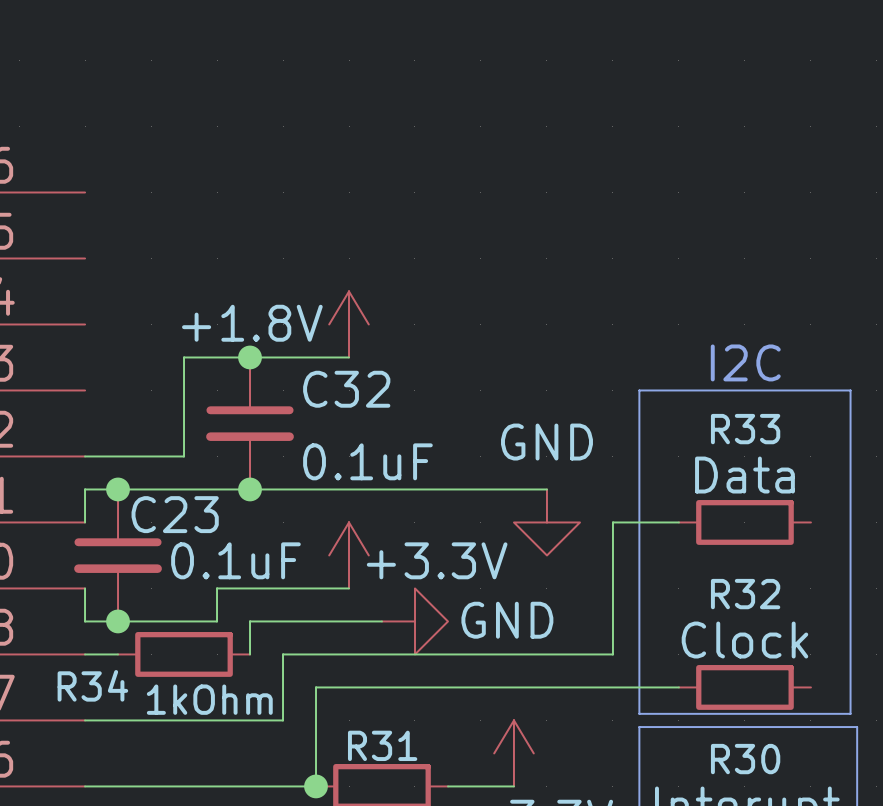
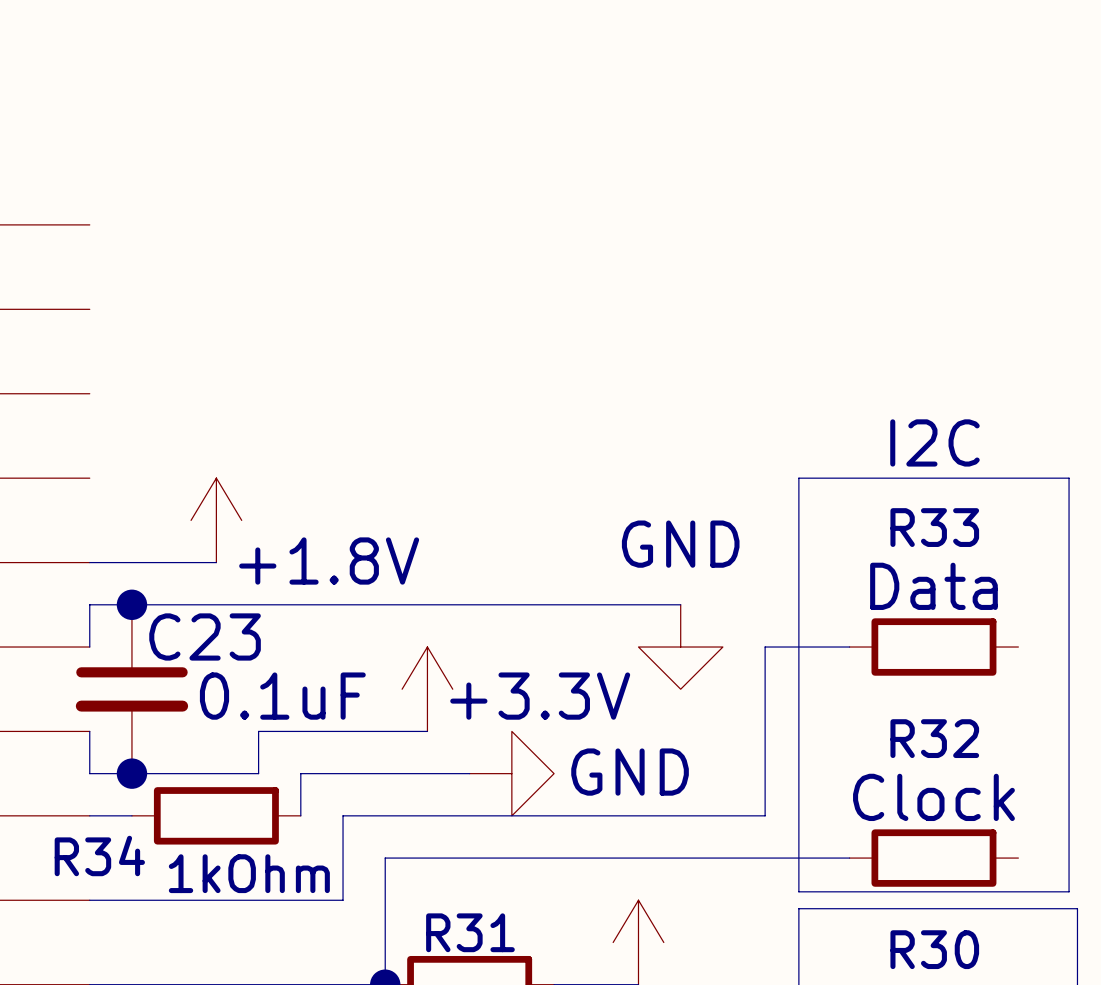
power symbol text position: +1.8V (252, 323) -> +1.8V (329, 561)
power symbol position: +1.8V (349, 324) -> +1.8V (216, 520)
junction: (250, 357) -> none
wire: (349, 357) (184, 357) (184, 456) -> none
C32: 0.1uF (250, 423) -> none
junction: (250, 489) -> none

